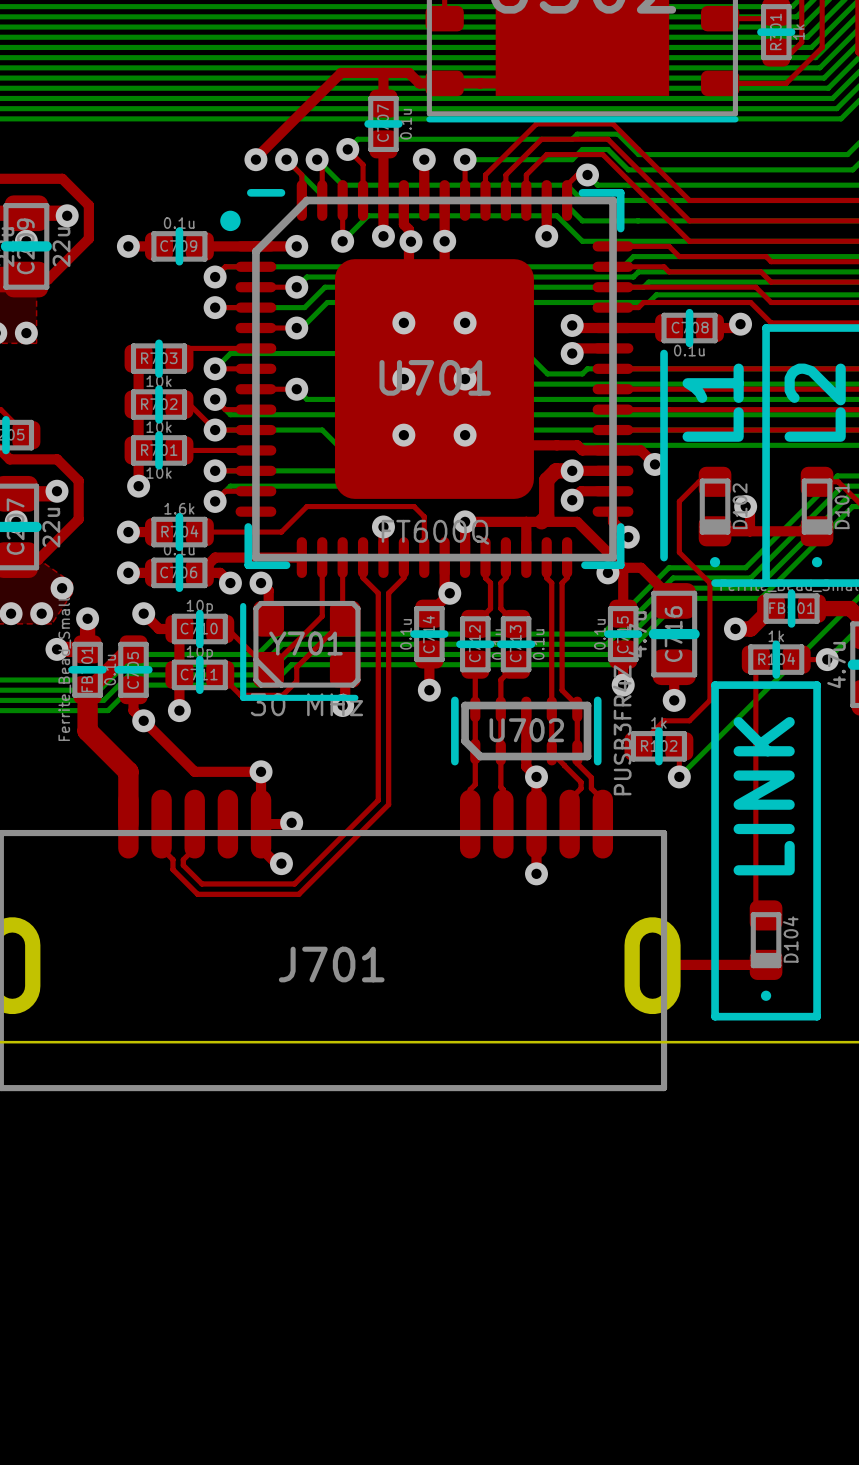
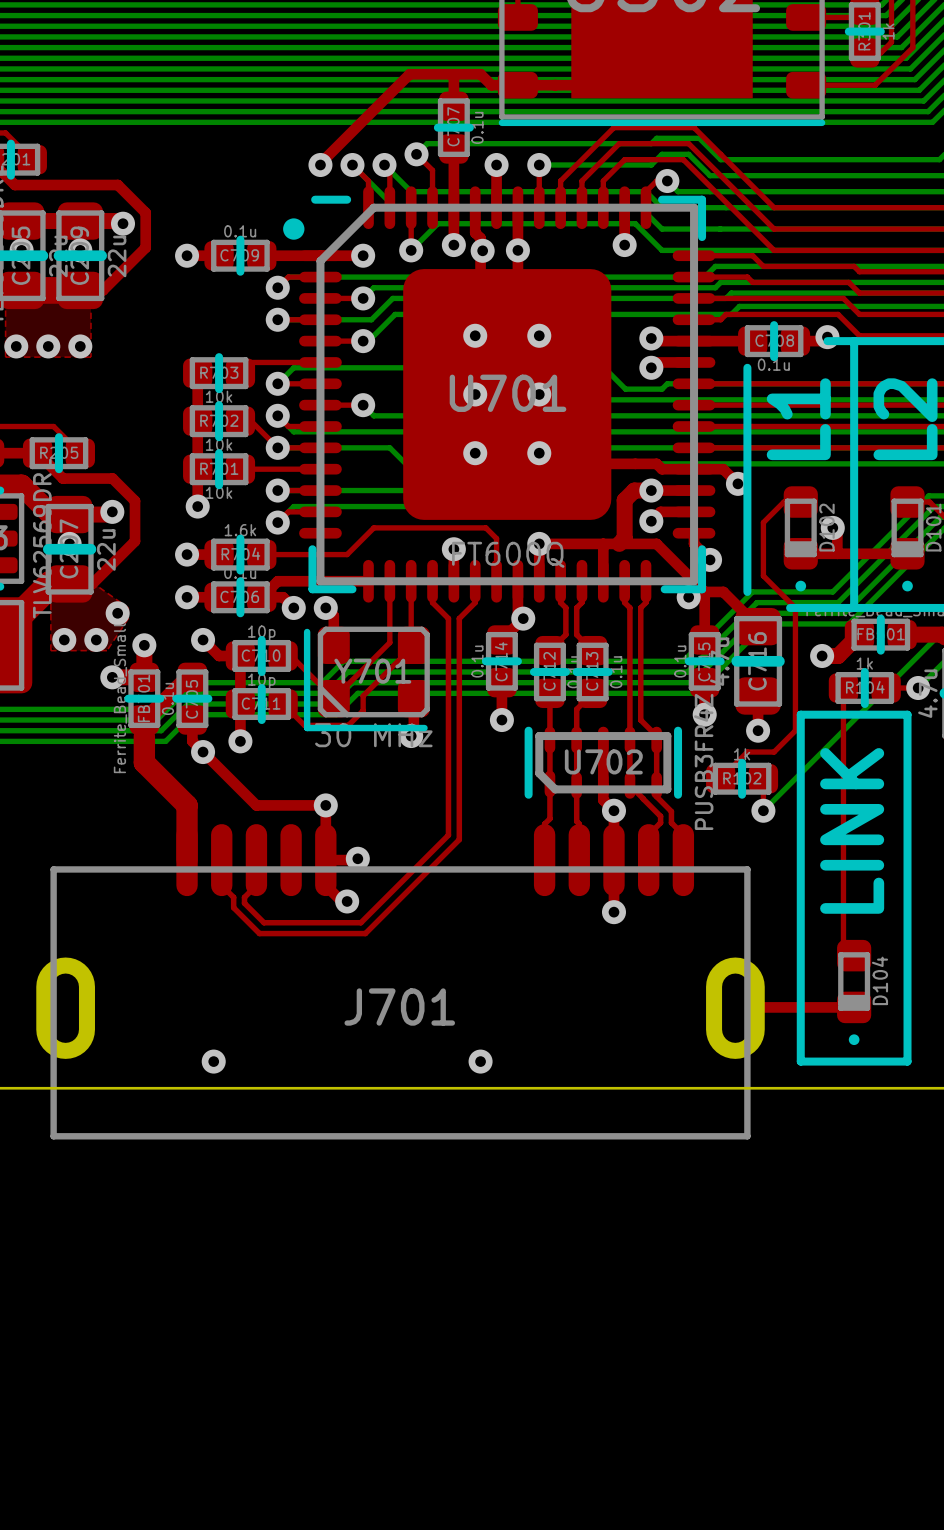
line: none -> (827, 341) (854, 341)
line: none -> (747, 581) (747, 591)
line: none -> (790, 607) (800, 607)
via: none -> (213, 1061)
via: none -> (480, 1061)

